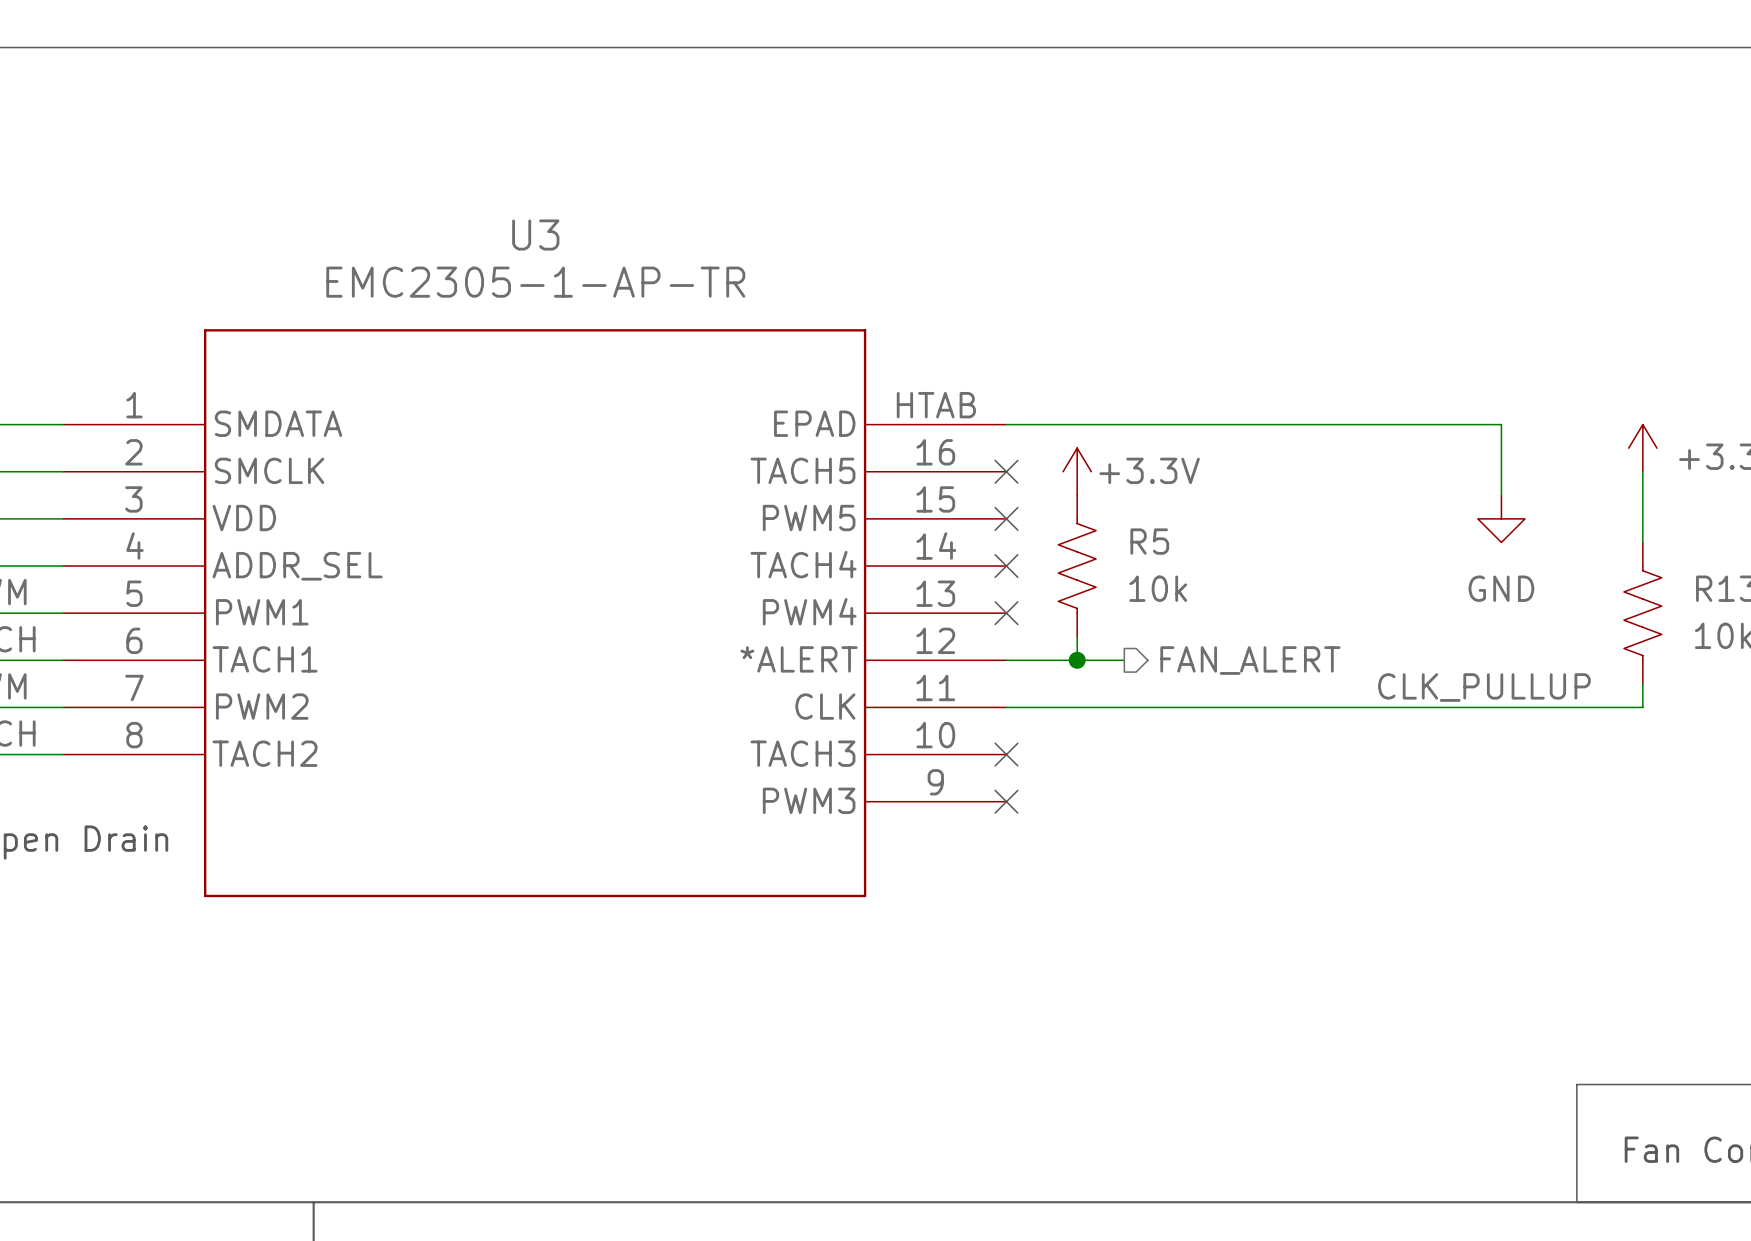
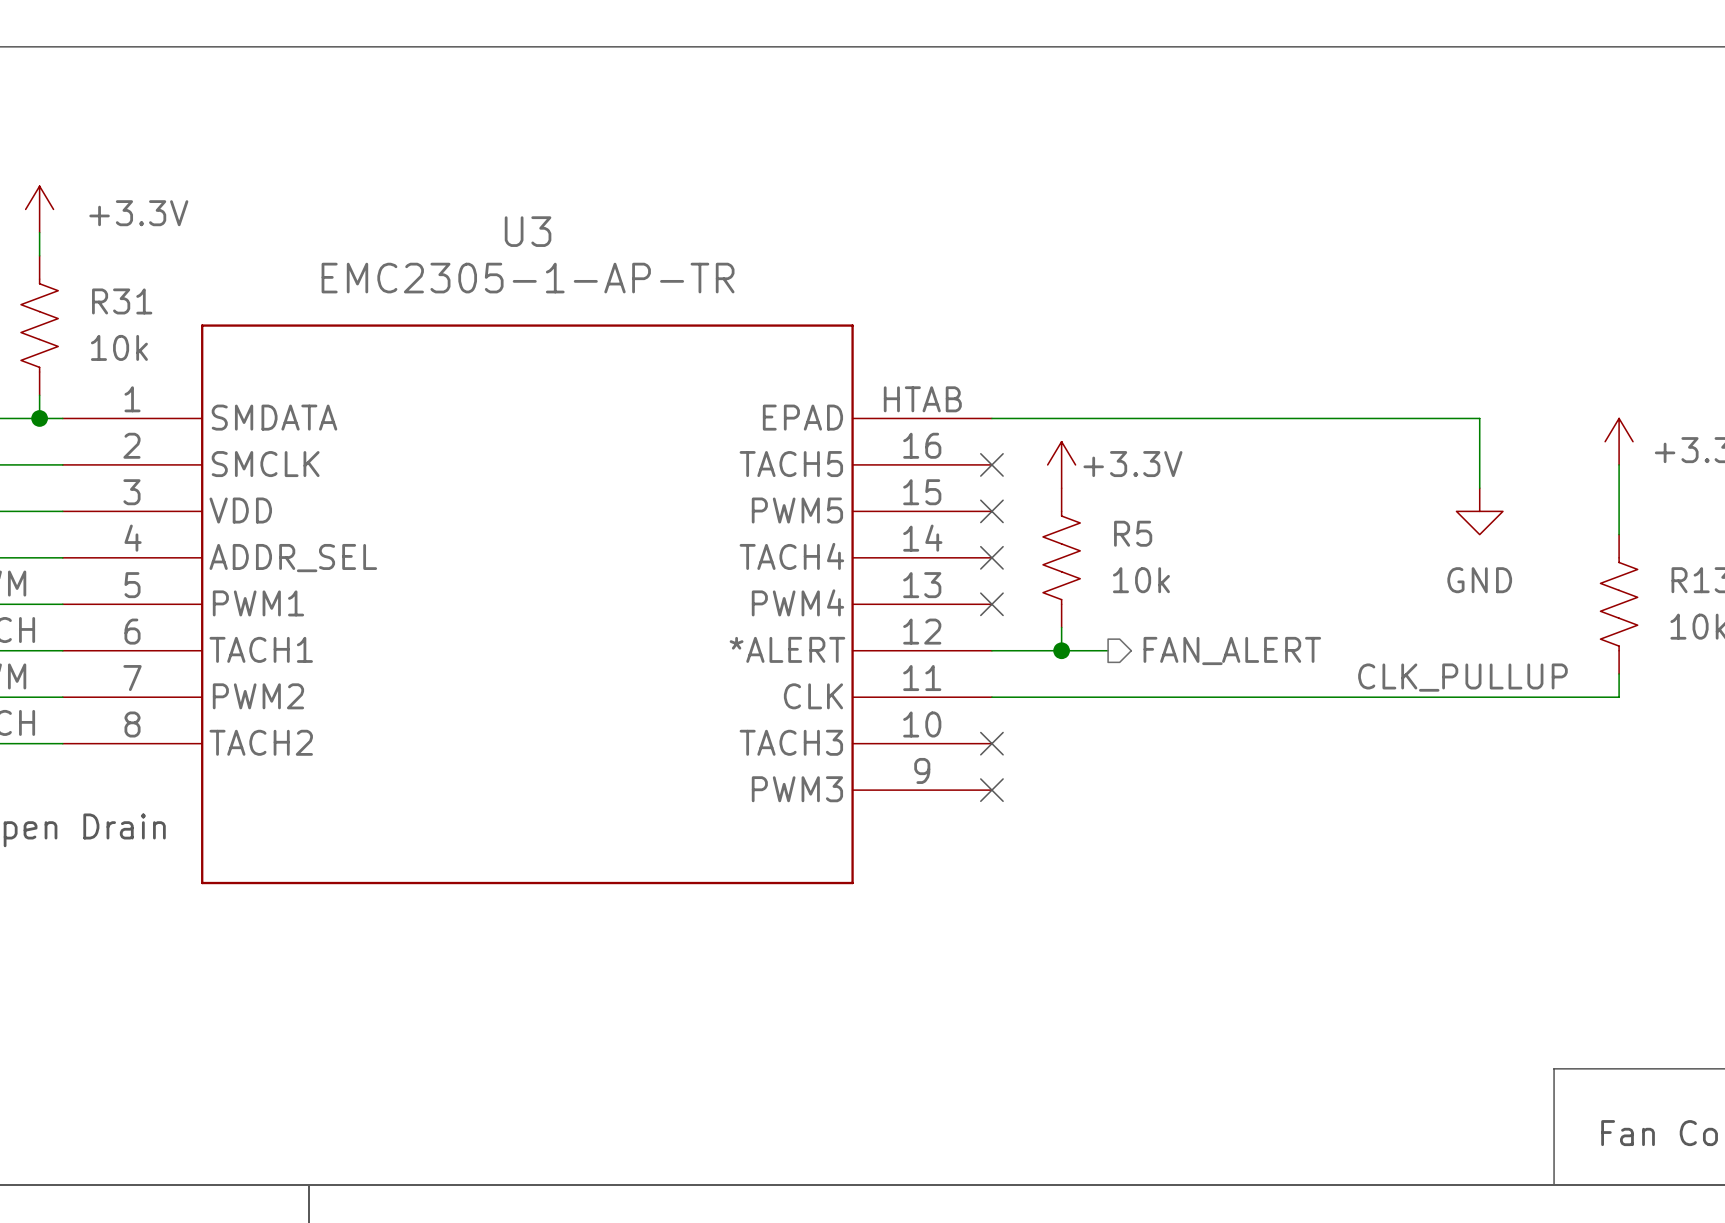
power symbol: none -> +3.3V (39, 209)
wire: none -> (39, 232) (39, 255)
R31: none -> 10k (39, 325)
wire: none -> (39, 395) (39, 418)
junction: none -> (39, 418)

